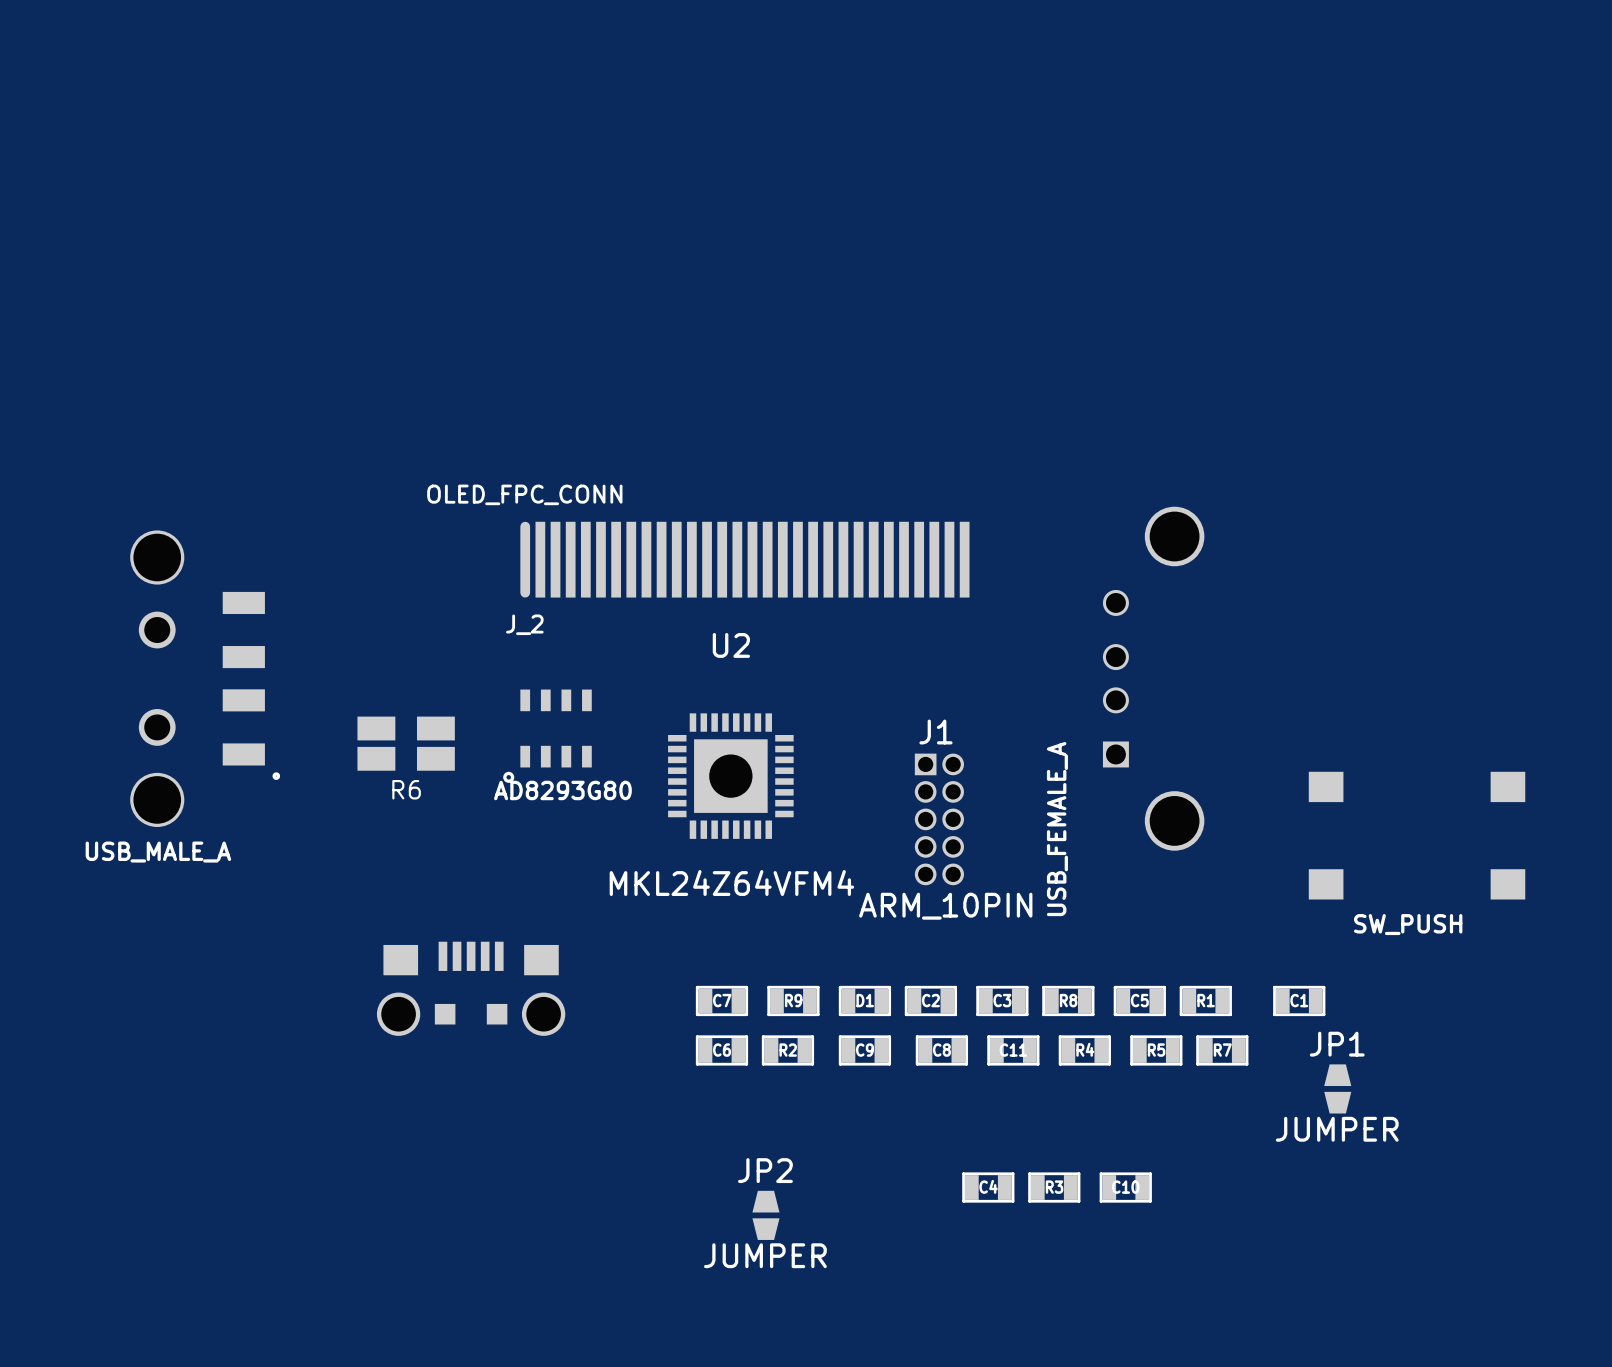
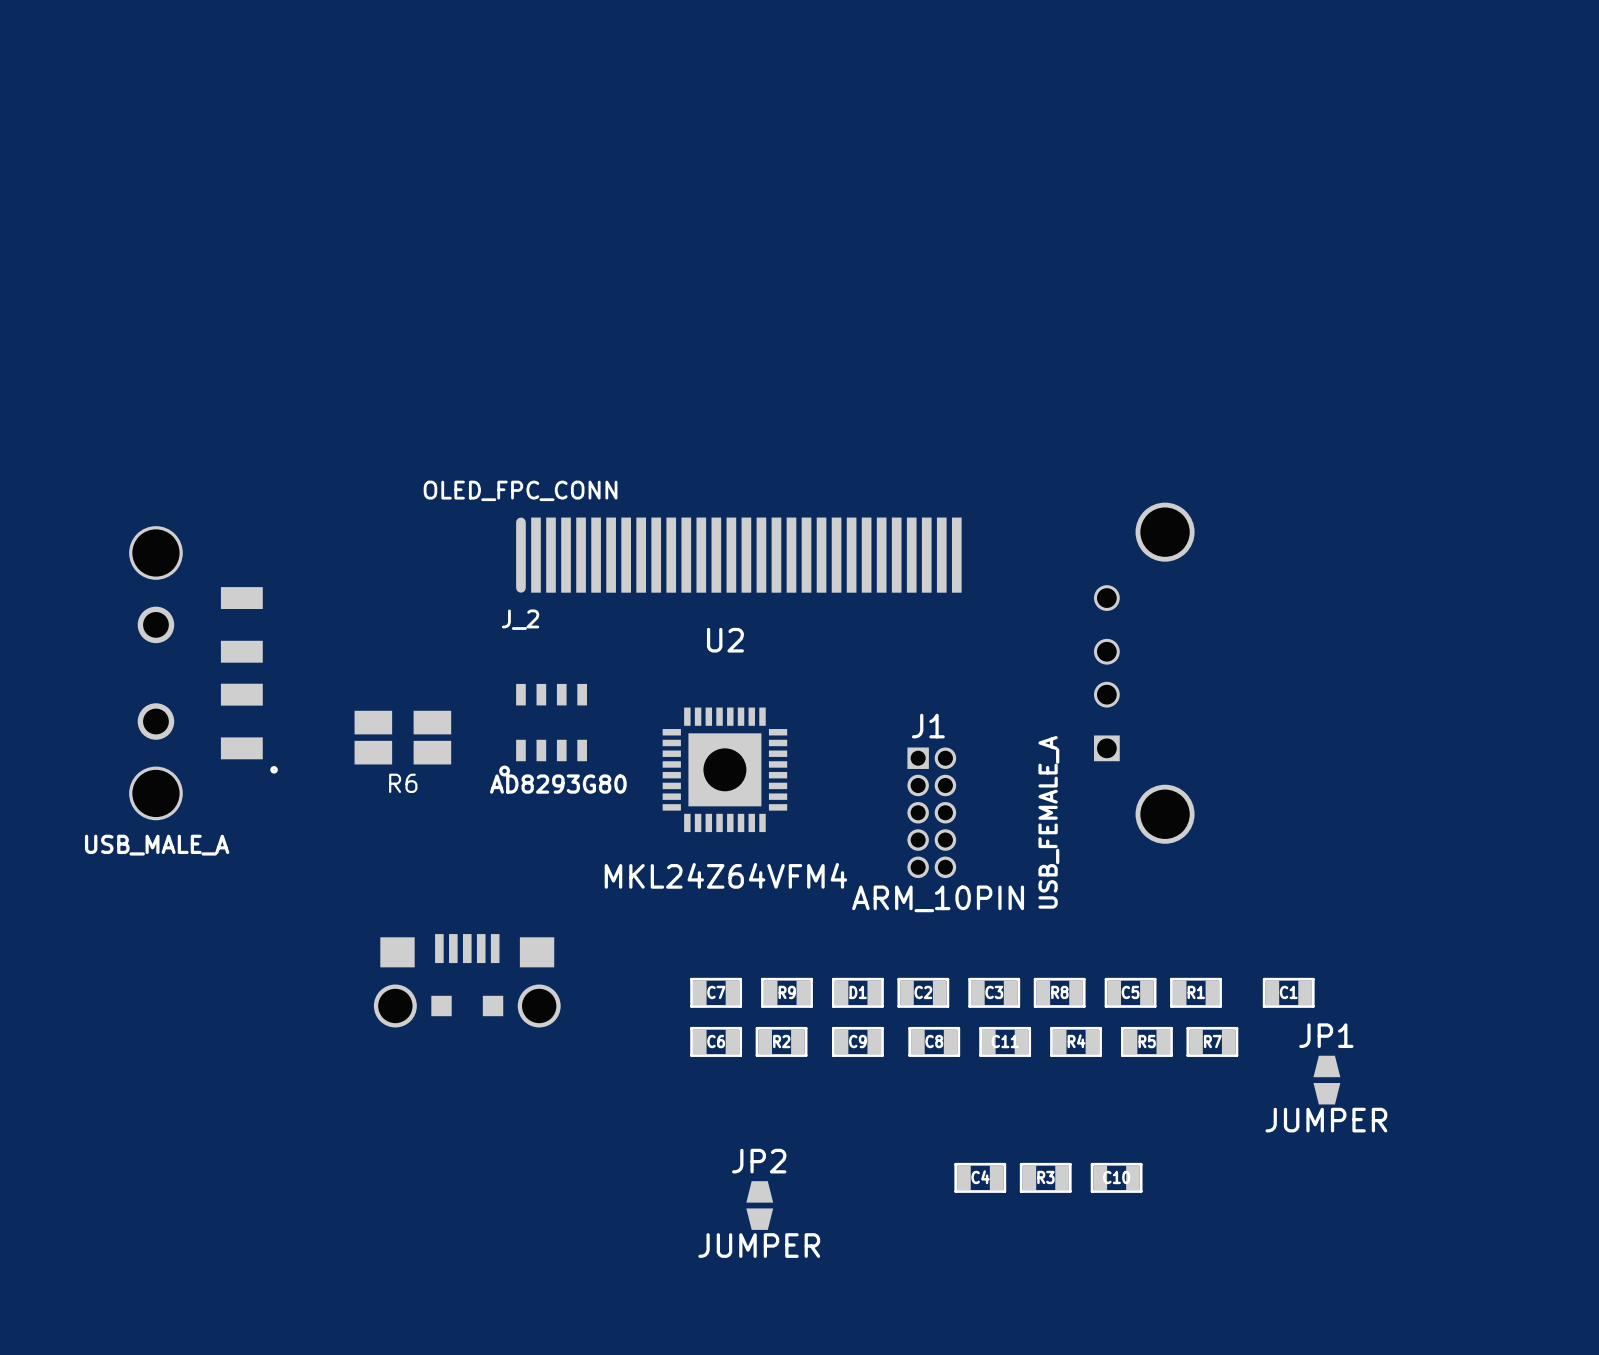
part: SW_PUSH (1417, 835) -> none

